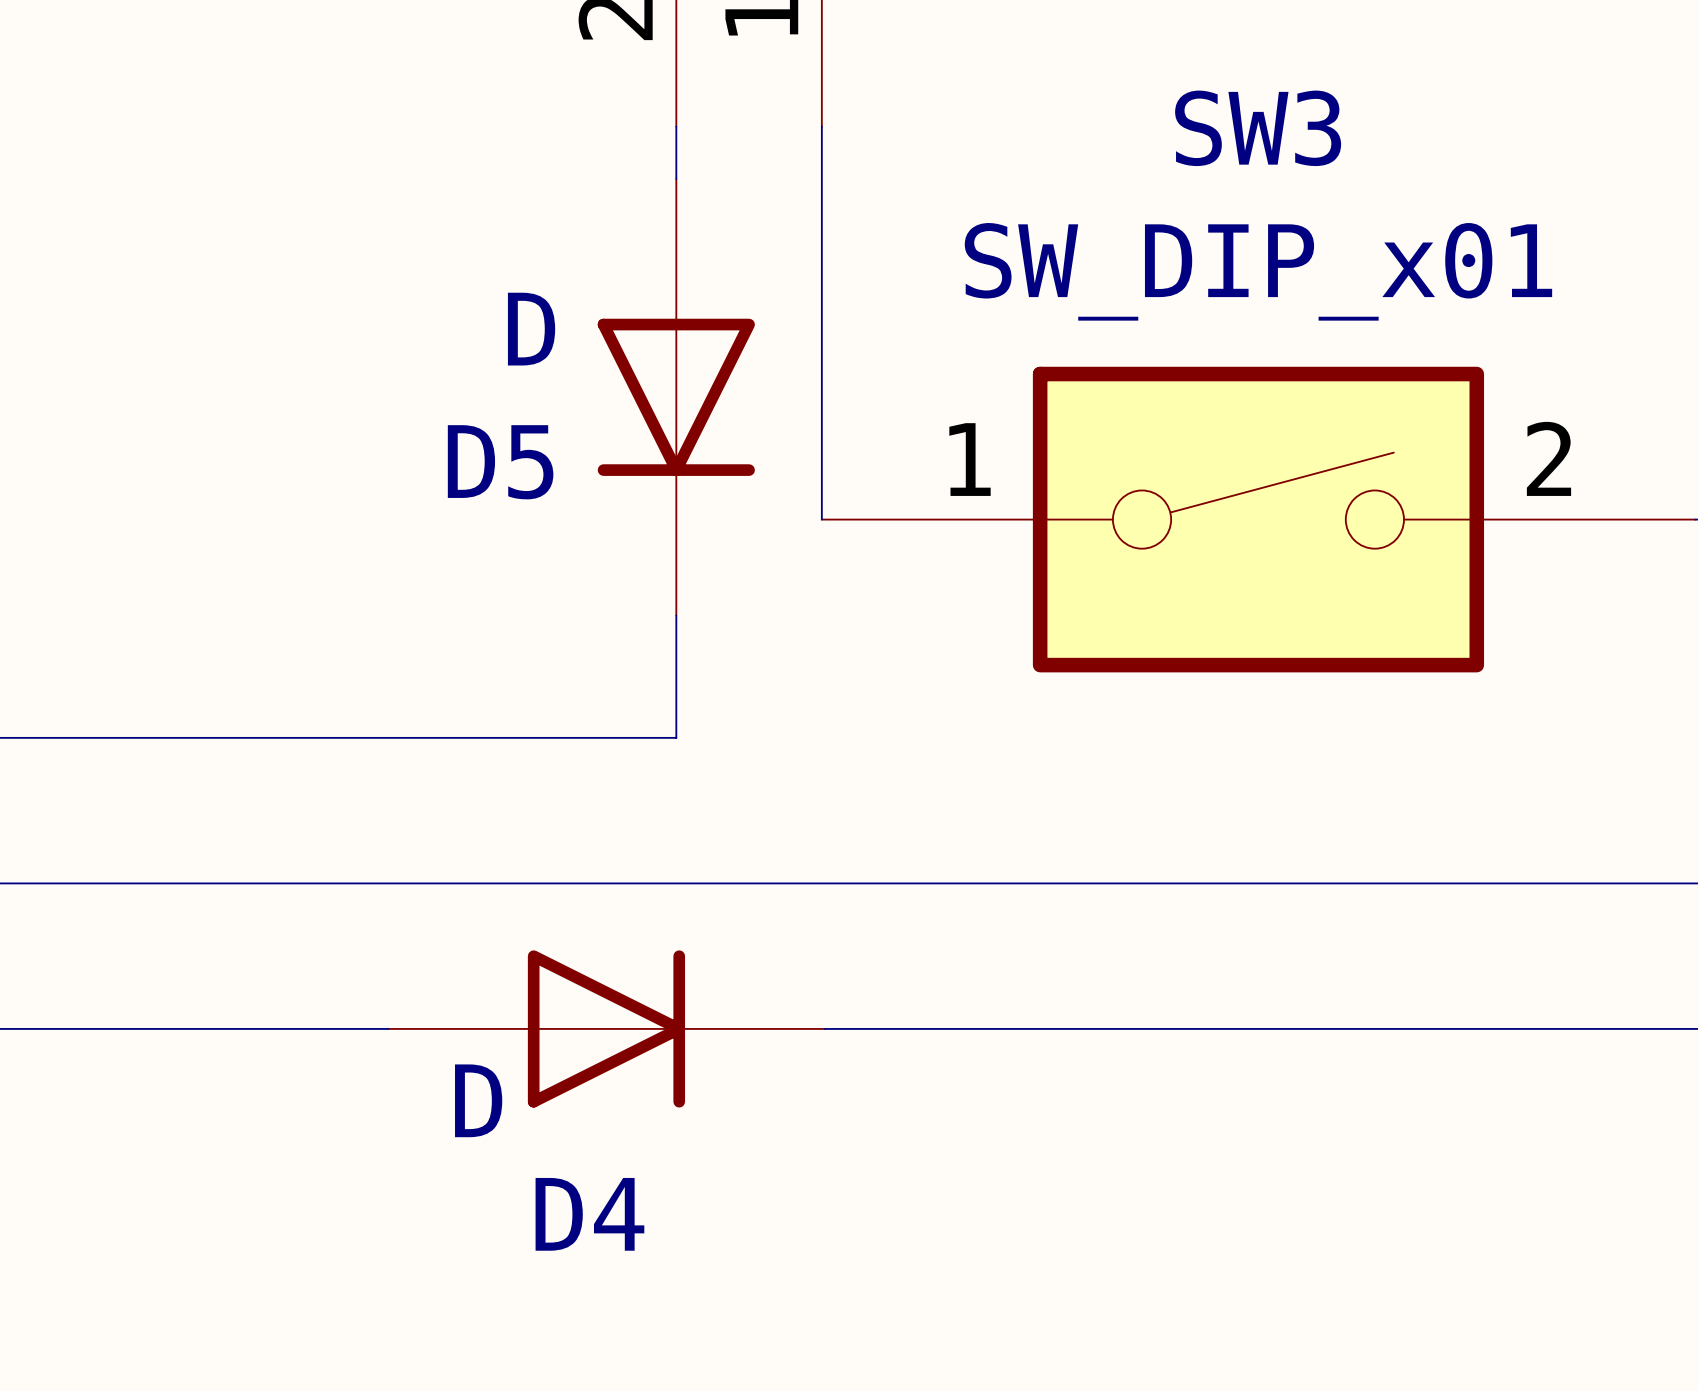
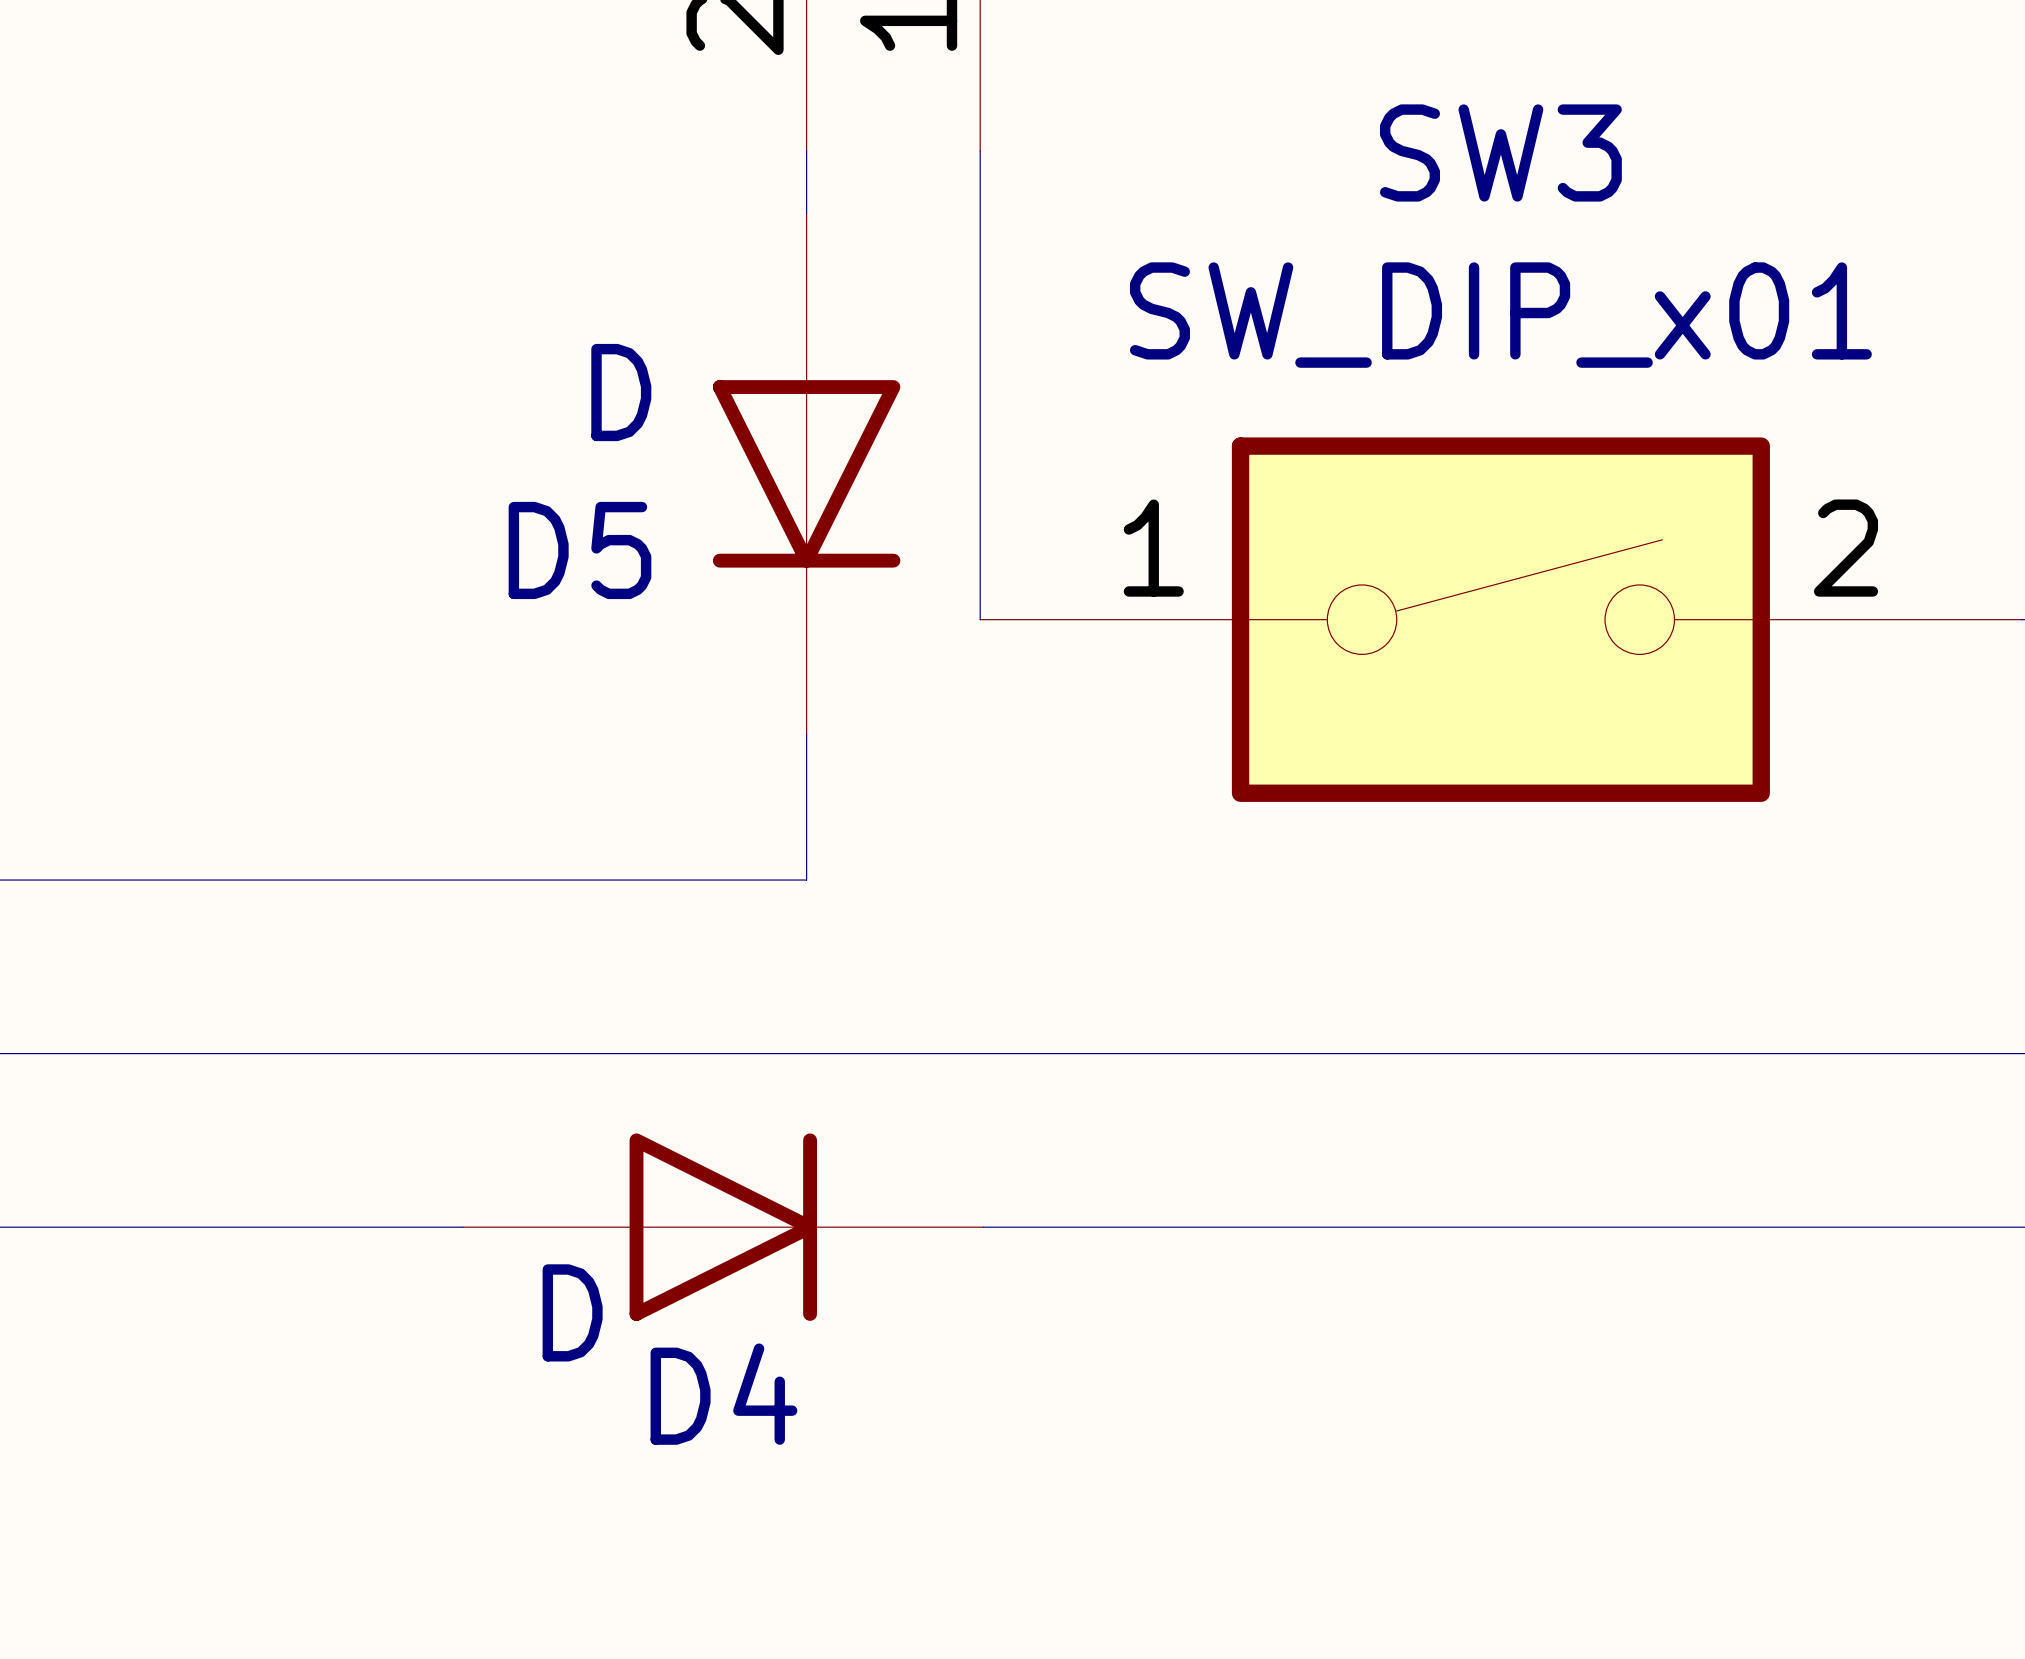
D4 name position: D4 (589, 1214) -> D4 (723, 1394)

